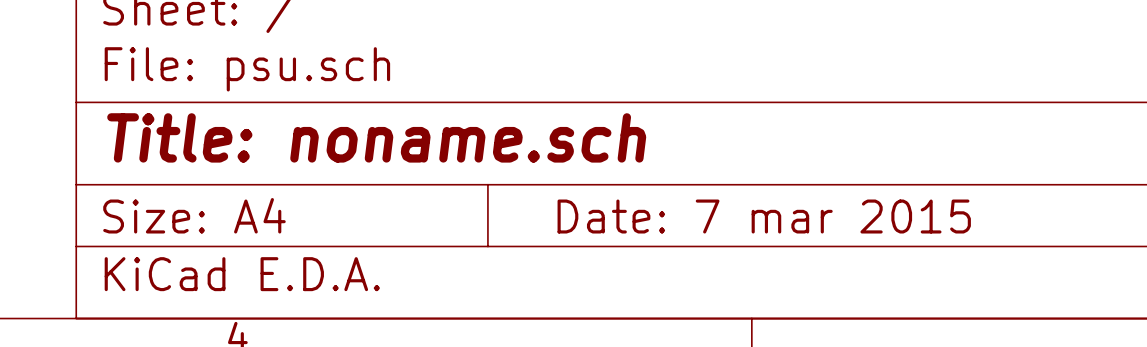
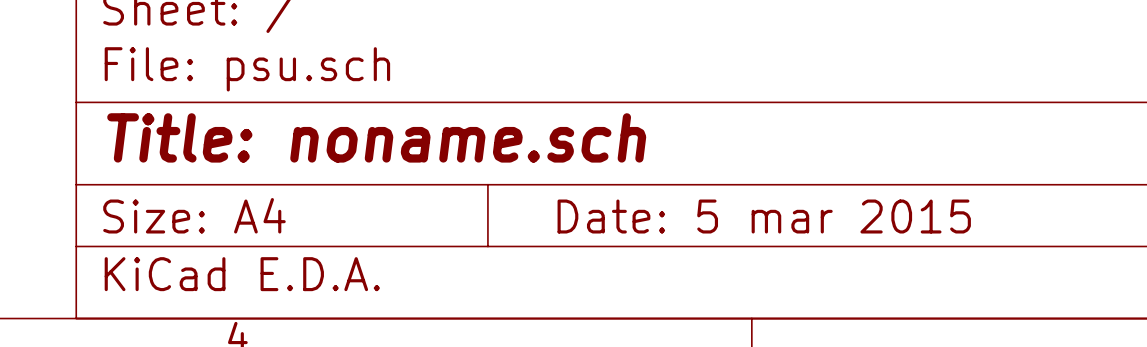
title block: Date: 7 mar 2015 (764, 216) -> Date: 5 mar 2015 (764, 216)

